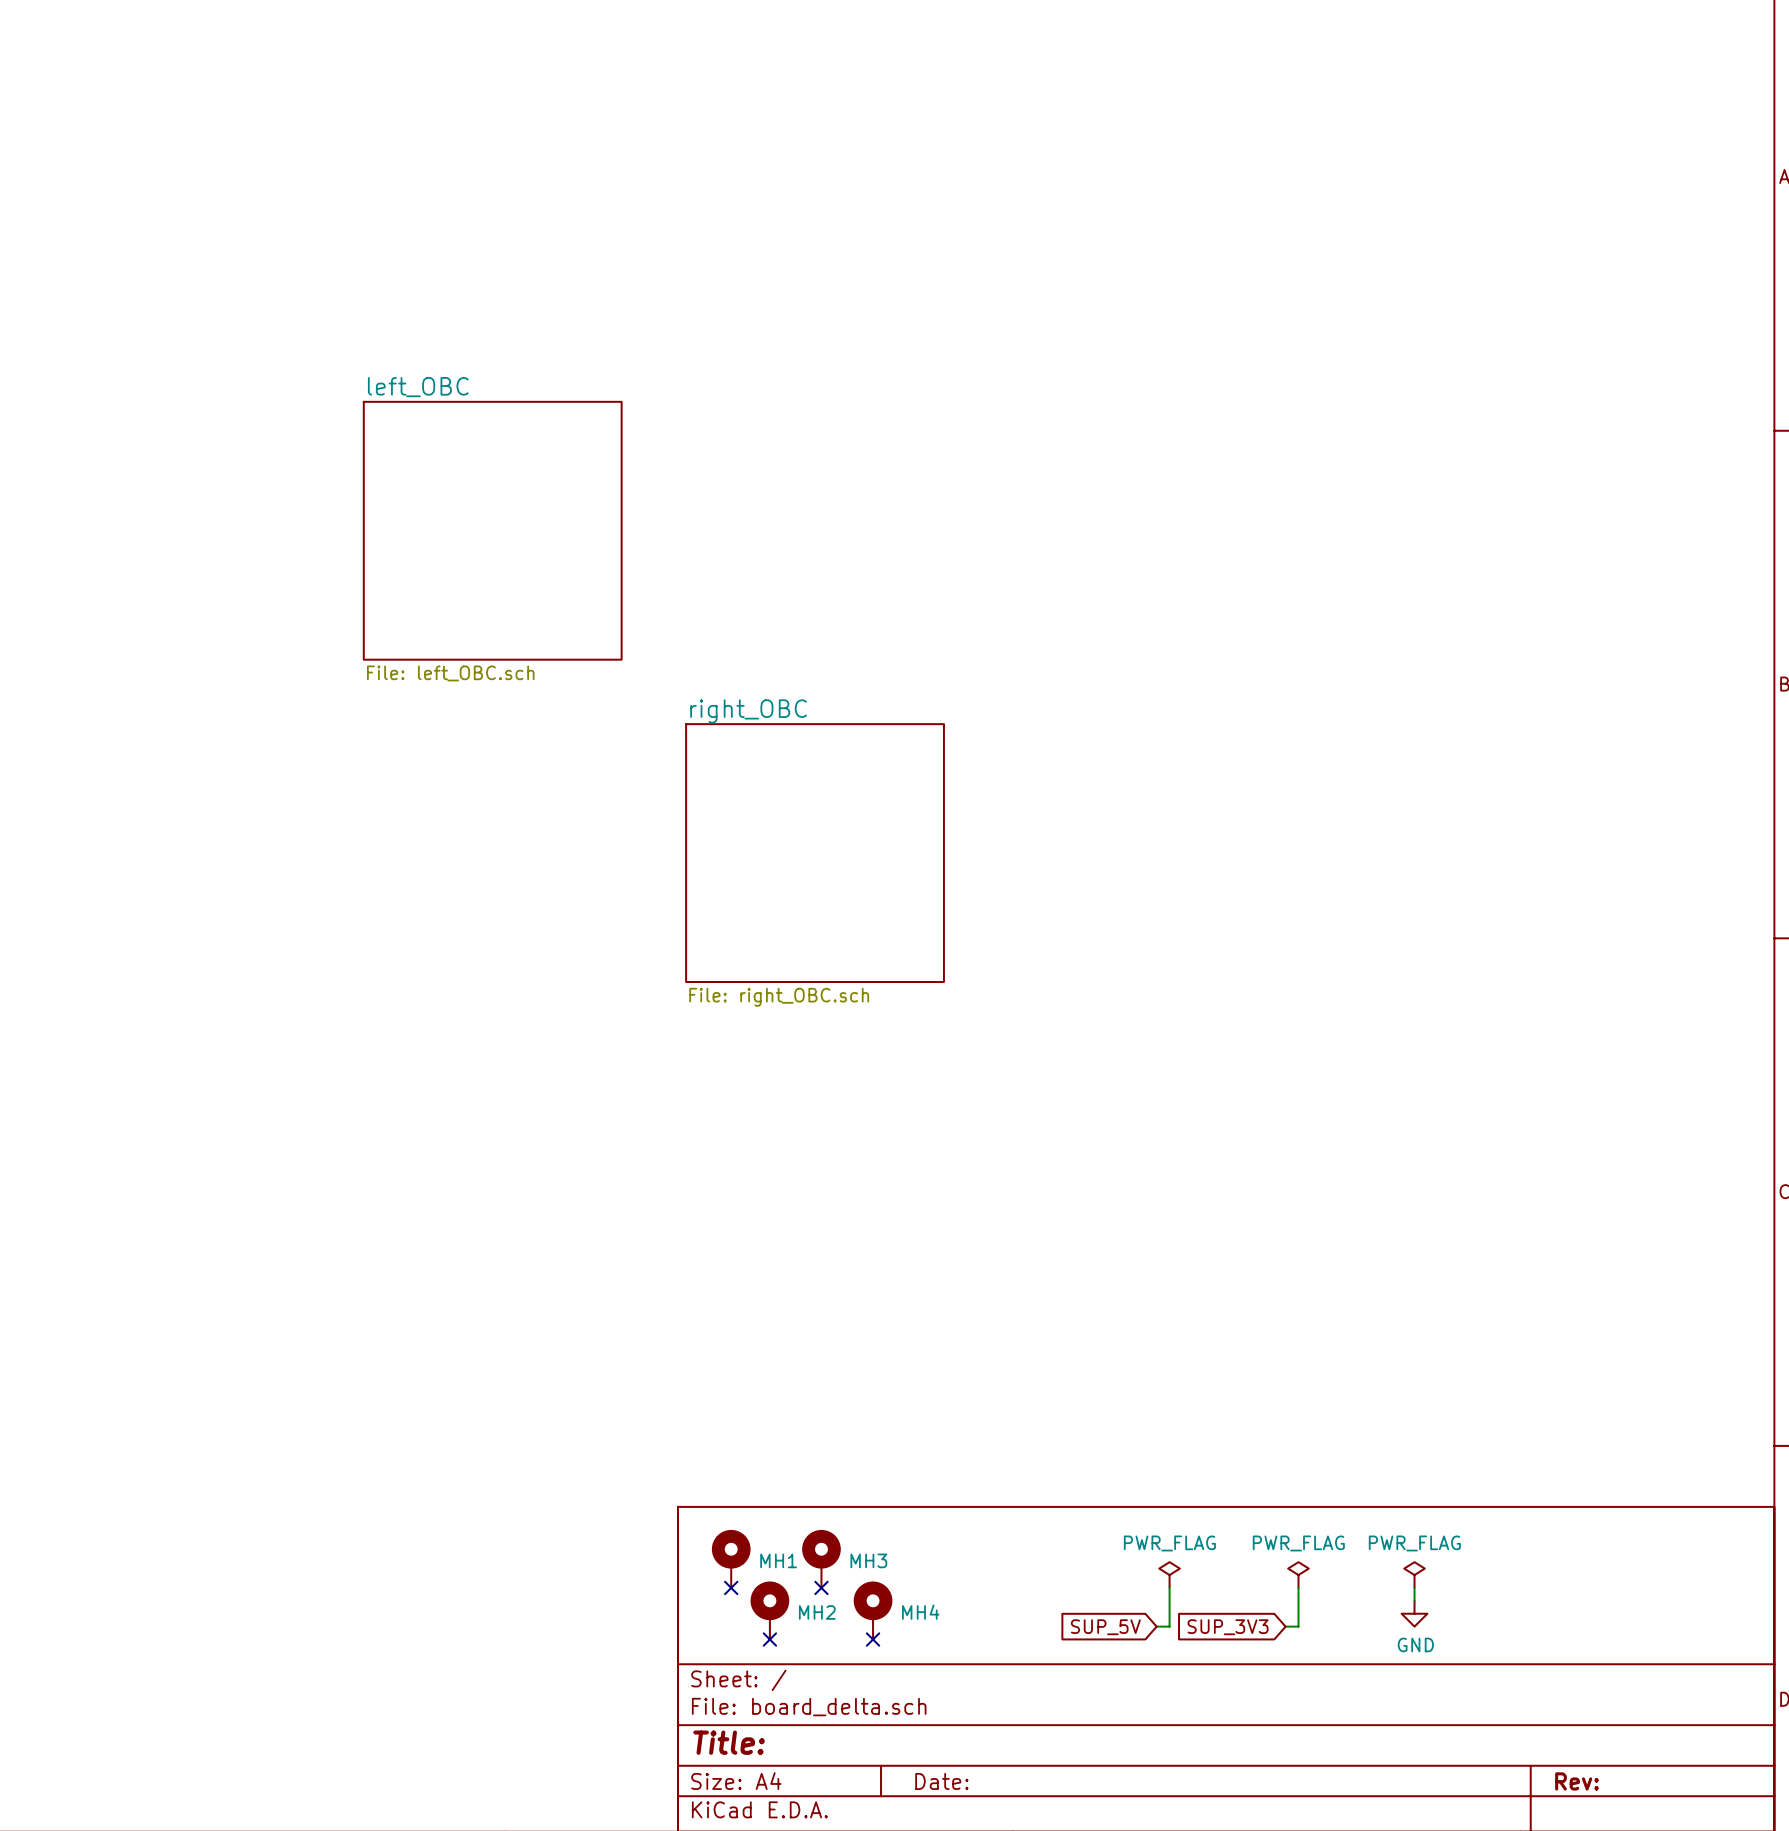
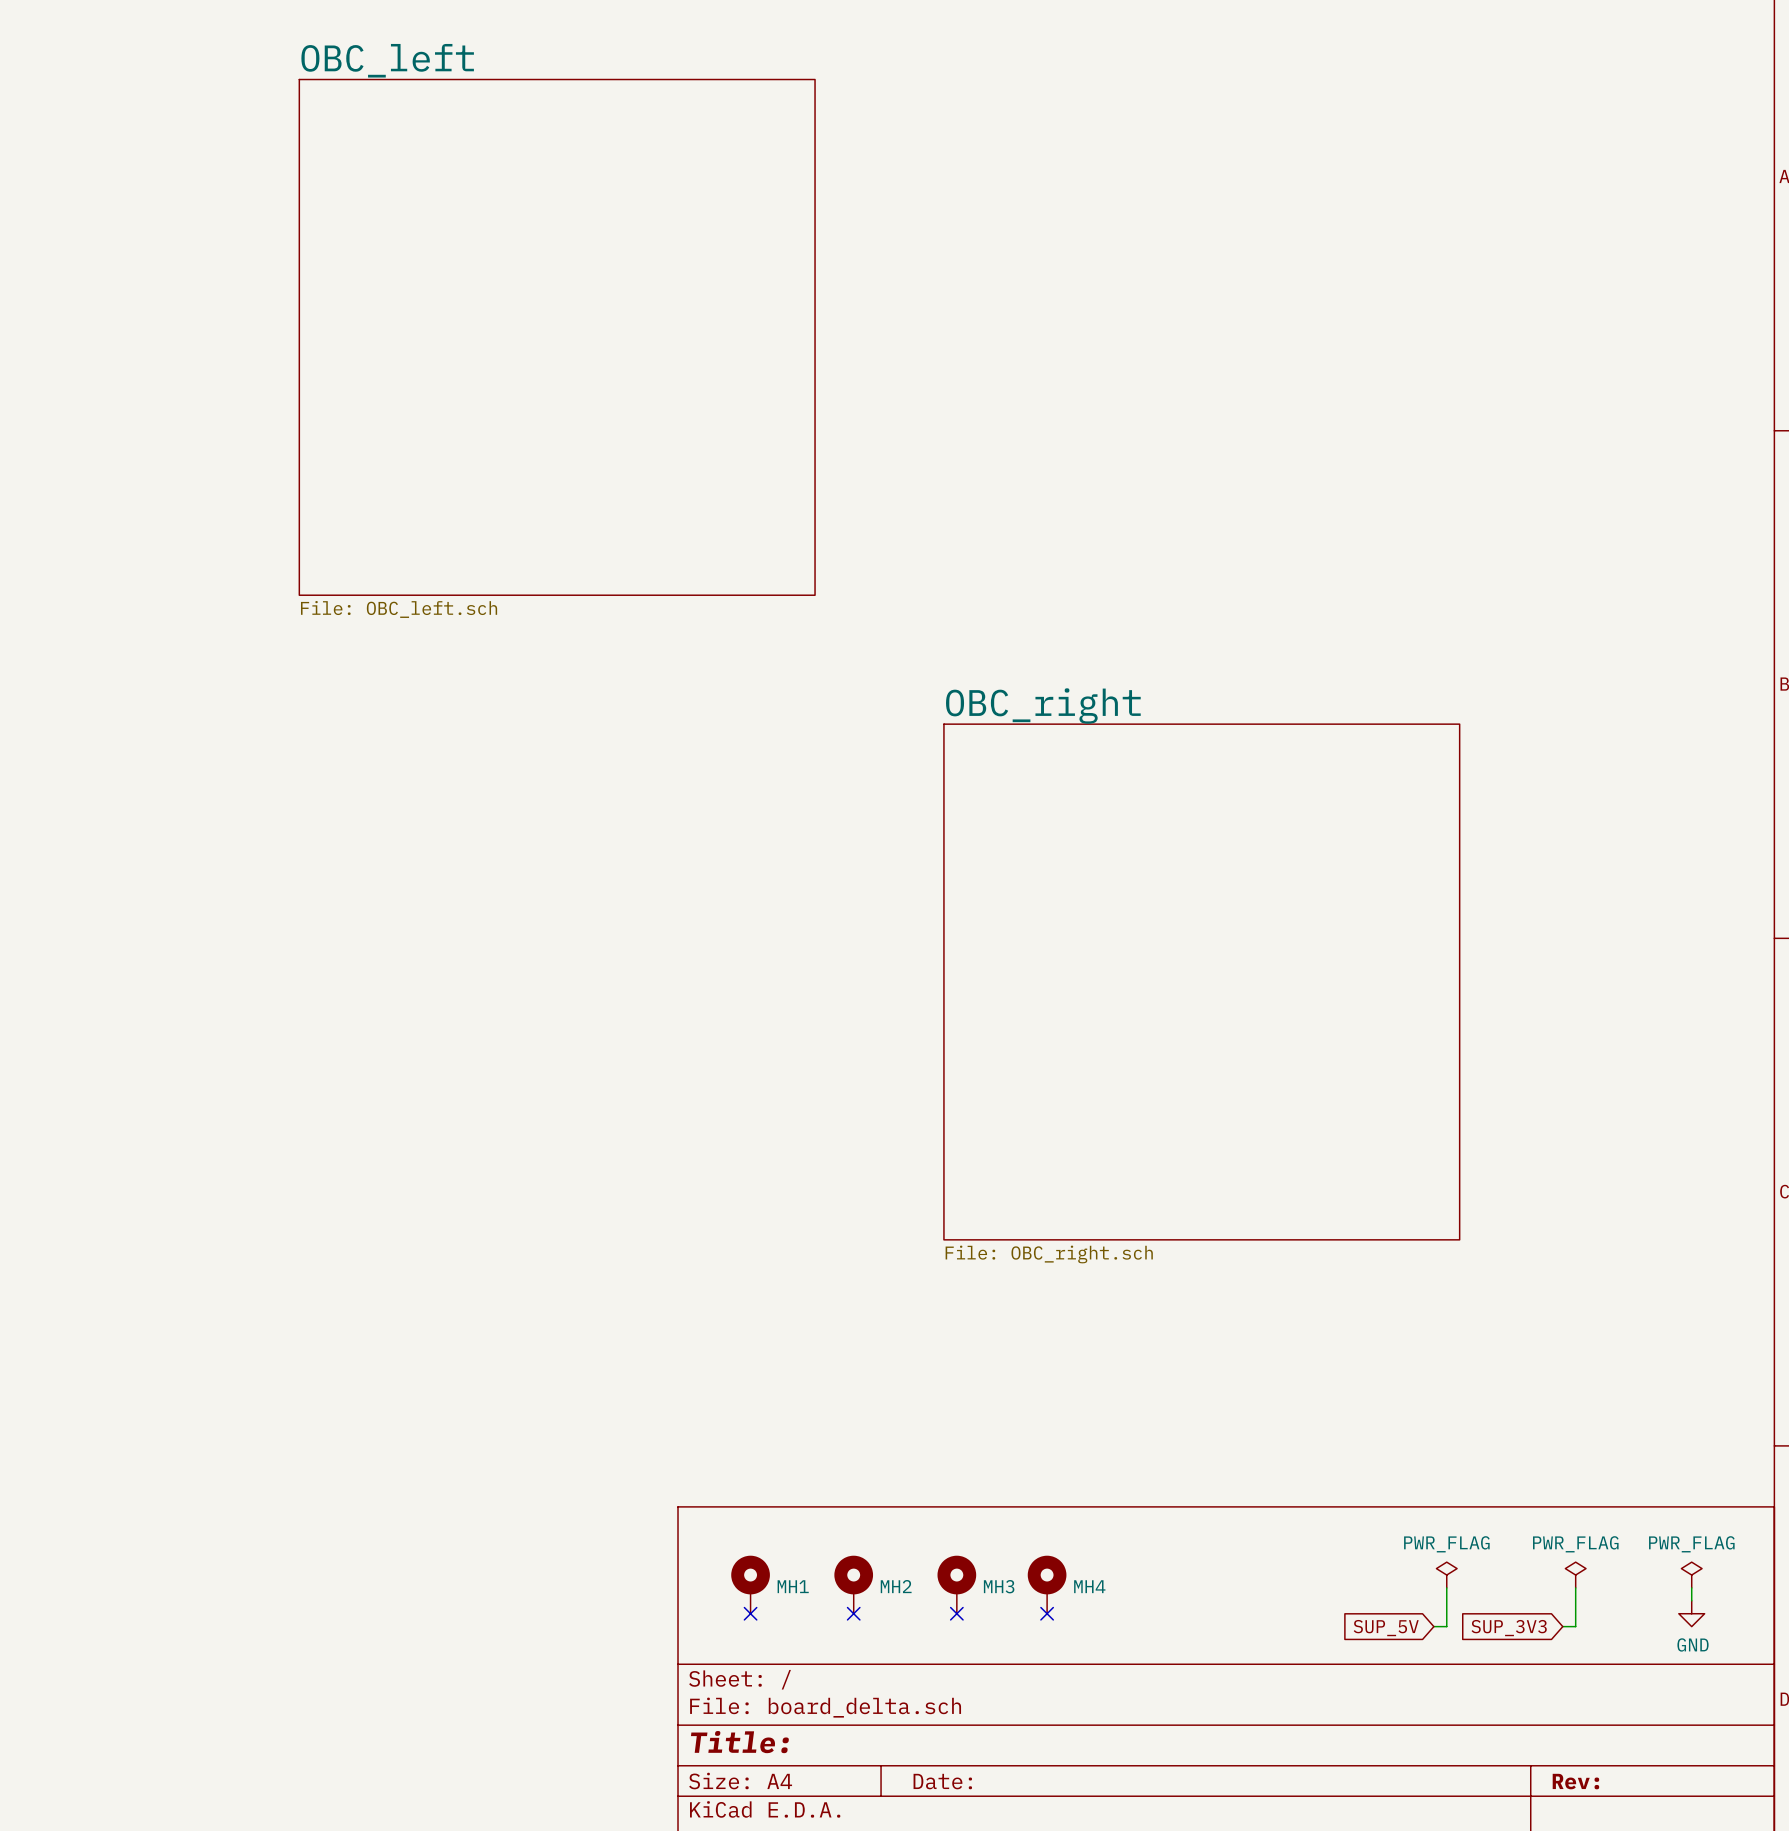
sheet OBC_left: none -> File: OBC_left.sch (557, 337)
sheet left_OBC: File: left_OBC.sch (492, 530) -> none
sheet right_OBC: File: right_OBC.sch (815, 853) -> none
sheet OBC_right: none -> File: OBC_right.sch (1201, 981)
MH1 position: (731, 1558) -> (750, 1584)
MH3 position: (821, 1558) -> (956, 1584)
power symbol: PWR_FLAG (1169, 1575) -> none
power symbol: PWR_FLAG (1298, 1575) -> none
power symbol position: PWR_FLAG (1414, 1575) -> PWR_FLAG (1446, 1575)
power symbol: none -> PWR_FLAG (1575, 1575)
power symbol: none -> PWR_FLAG (1691, 1575)
no-connect mark: (731, 1587) -> none
no-connect mark: (821, 1587) -> none
wire: (1169, 1587) (1169, 1626) (1156, 1626) -> none
wire: (1298, 1587) (1298, 1626) (1285, 1626) -> (1446, 1587) (1446, 1626) (1433, 1626)
wire: (1414, 1587) (1414, 1600) -> none
wire: none -> (1575, 1587) (1575, 1626) (1562, 1626)
wire: none -> (1691, 1587) (1691, 1600)
MH2 position: (769, 1610) -> (853, 1584)
MH4 position: (873, 1610) -> (1047, 1584)
no-connect mark: none -> (750, 1613)
no-connect mark: none -> (853, 1613)
no-connect mark: none -> (956, 1613)
no-connect mark: none -> (1047, 1613)
power symbol: GND (1414, 1613) -> none
power symbol: none -> GND (1691, 1613)
global label: SUP_5V (1105, 1627) -> none
global label: SUP_3V3 (1228, 1627) -> none
global label: none -> SUP_5V (1386, 1628)
global label: none -> SUP_3V3 (1509, 1628)
no-connect mark: (769, 1639) -> none
no-connect mark: (873, 1639) -> none

